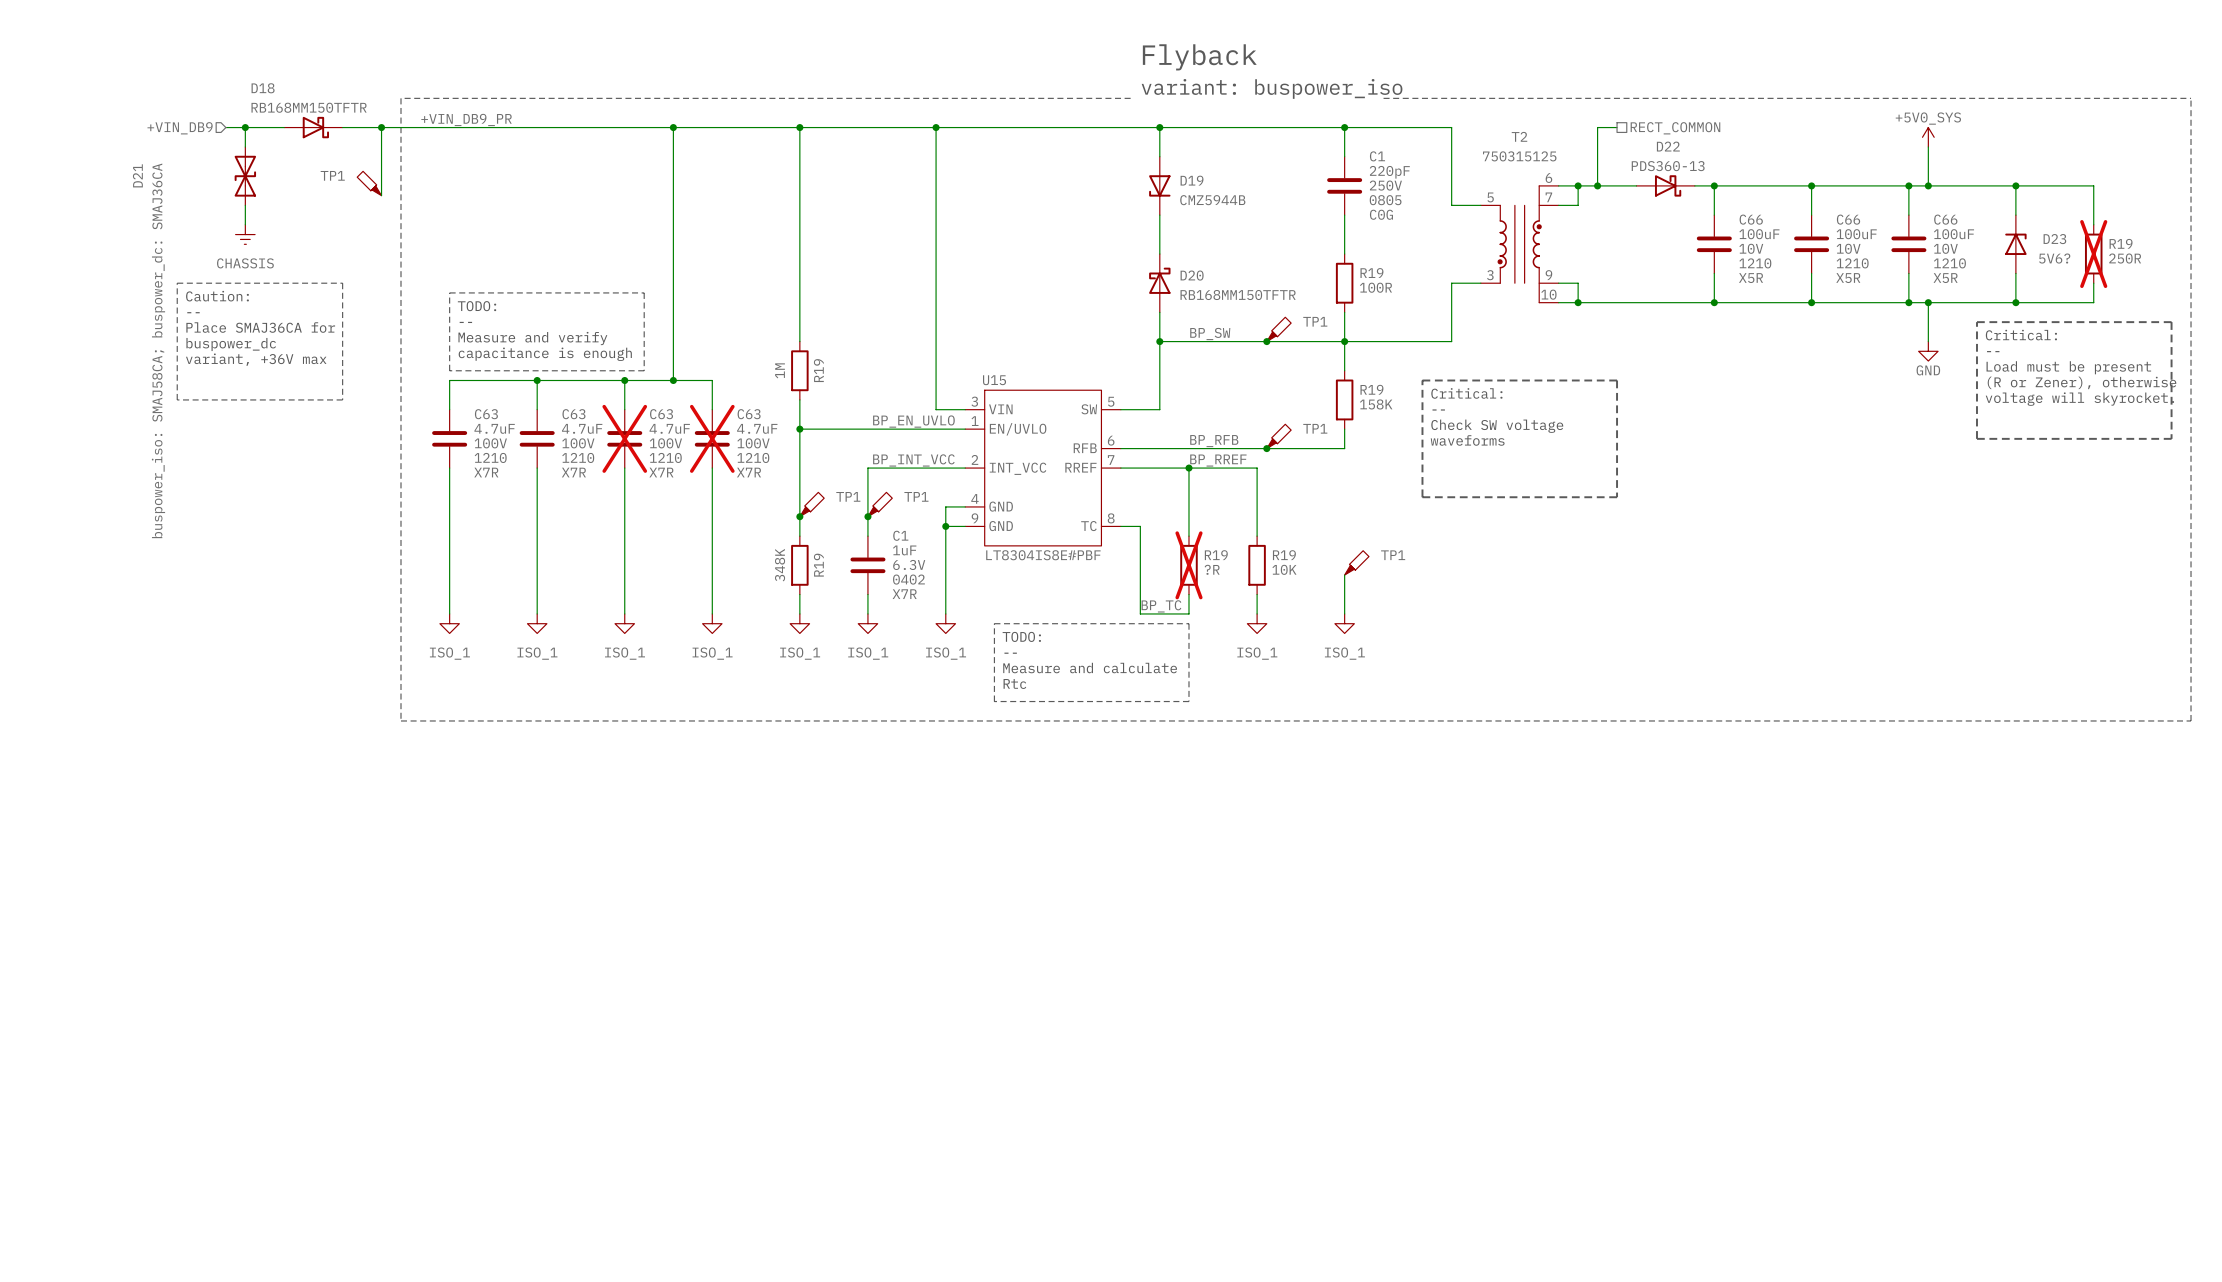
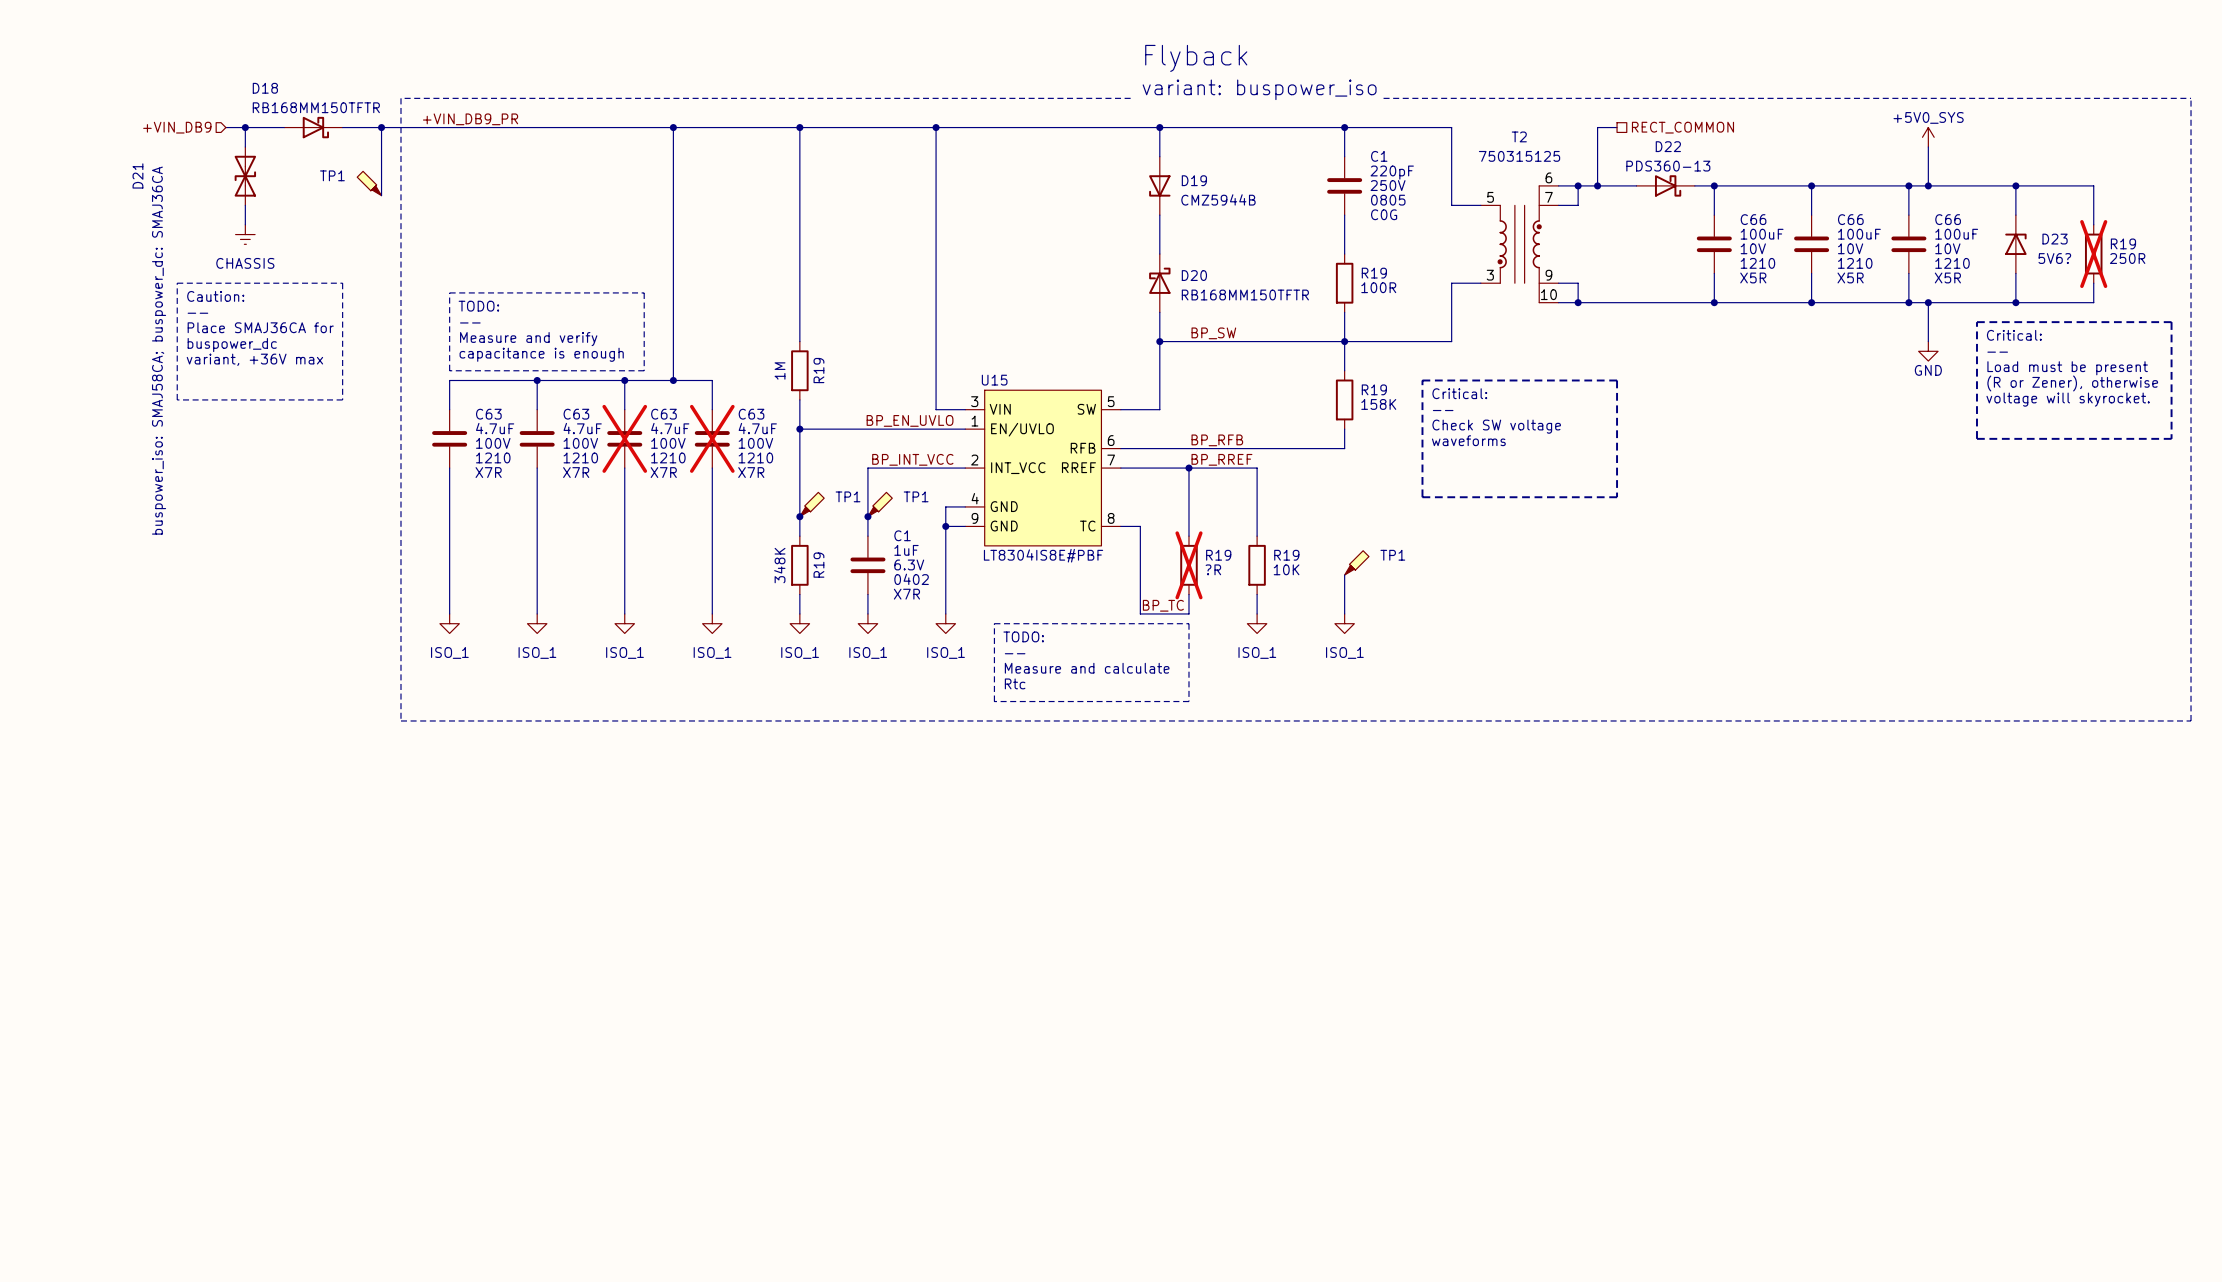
TP1: (1278, 329) -> none
junction: (1266, 341) -> none
TP1: (1278, 436) -> none
junction: (1266, 448) -> none

